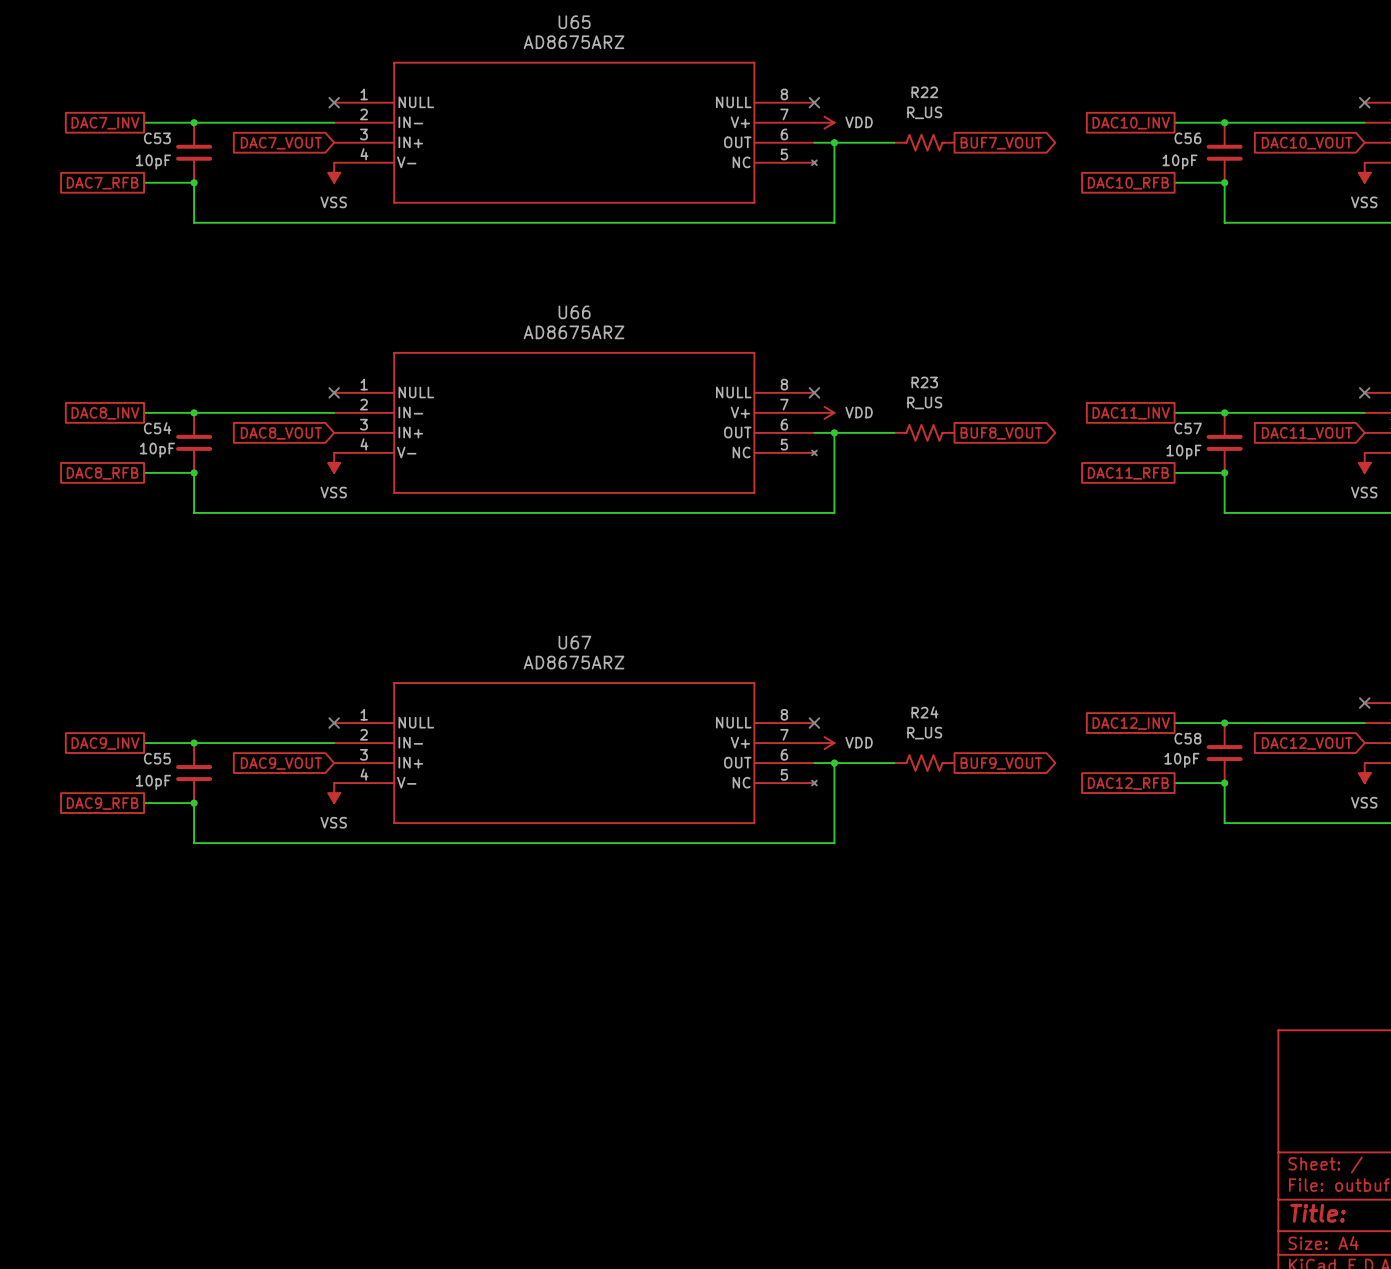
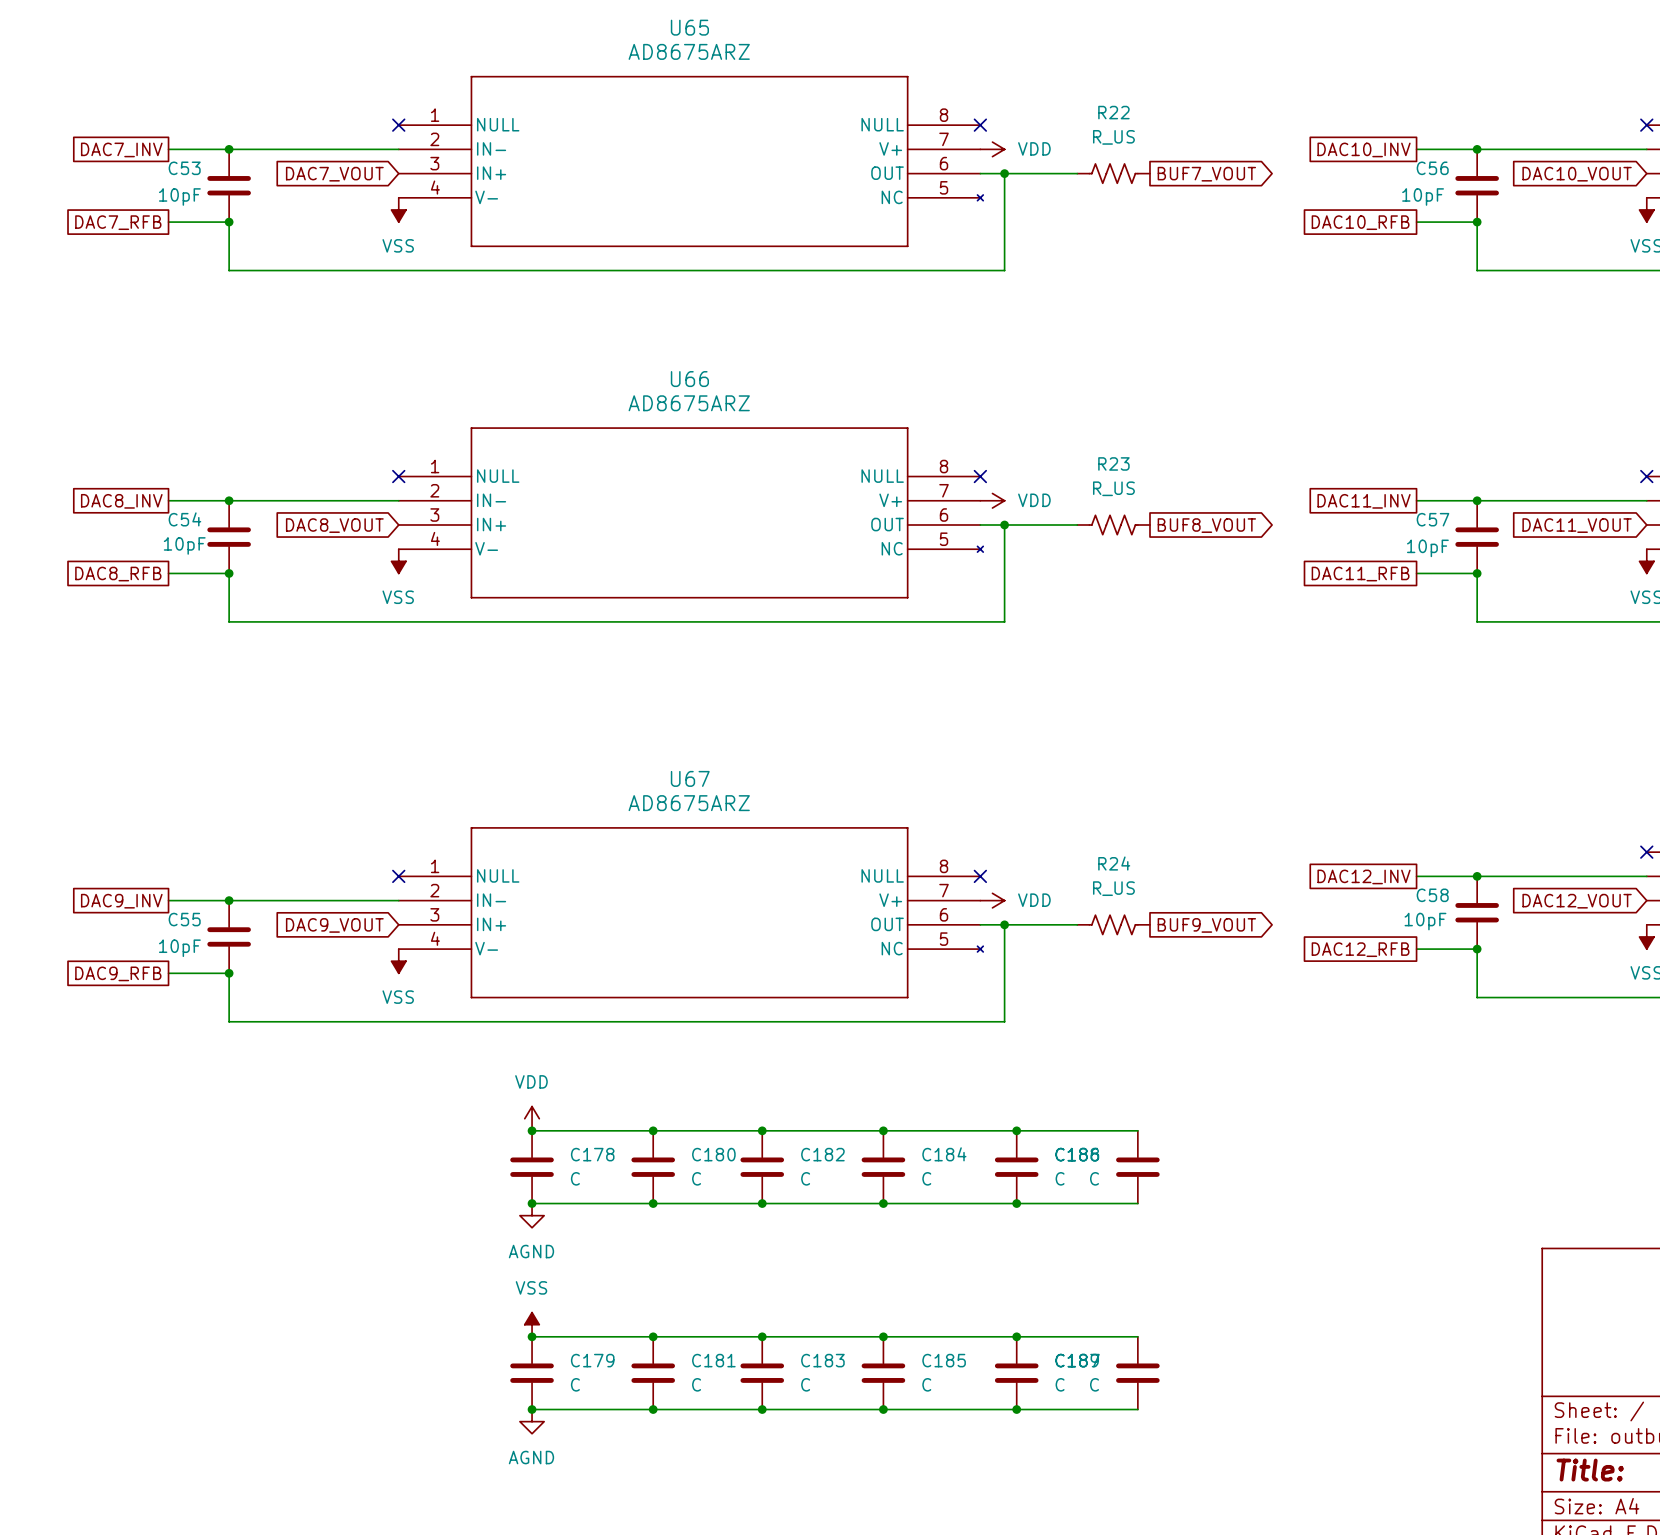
power symbol: none -> VDD (532, 1118)
wire: none -> (532, 1130) (1137, 1130)
junction: none -> (532, 1130)
junction: none -> (653, 1130)
junction: none -> (762, 1130)
junction: none -> (883, 1130)
junction: none -> (1016, 1130)
C178: none -> C (532, 1167)
C180: none -> C (653, 1167)
C182: none -> C (762, 1167)
C184: none -> C (883, 1167)
part: none -> C (1016, 1167)
part: none -> C (1137, 1167)
wire: none -> (532, 1203) (1137, 1203)
junction: none -> (532, 1203)
junction: none -> (653, 1203)
junction: none -> (762, 1203)
junction: none -> (883, 1203)
junction: none -> (1016, 1203)
power symbol: none -> AGND (532, 1215)
power symbol: none -> VSS (532, 1324)
wire: none -> (532, 1336) (1137, 1336)
junction: none -> (532, 1336)
junction: none -> (653, 1336)
junction: none -> (762, 1336)
junction: none -> (883, 1336)
junction: none -> (1016, 1336)
C179: none -> C (532, 1373)
C181: none -> C (653, 1373)
C183: none -> C (762, 1373)
C185: none -> C (883, 1373)
part: none -> C (1016, 1373)
part: none -> C (1137, 1373)
wire: none -> (532, 1409) (1137, 1409)
junction: none -> (532, 1409)
junction: none -> (653, 1409)
junction: none -> (762, 1409)
junction: none -> (883, 1409)
junction: none -> (1016, 1409)
power symbol: none -> AGND (532, 1421)

